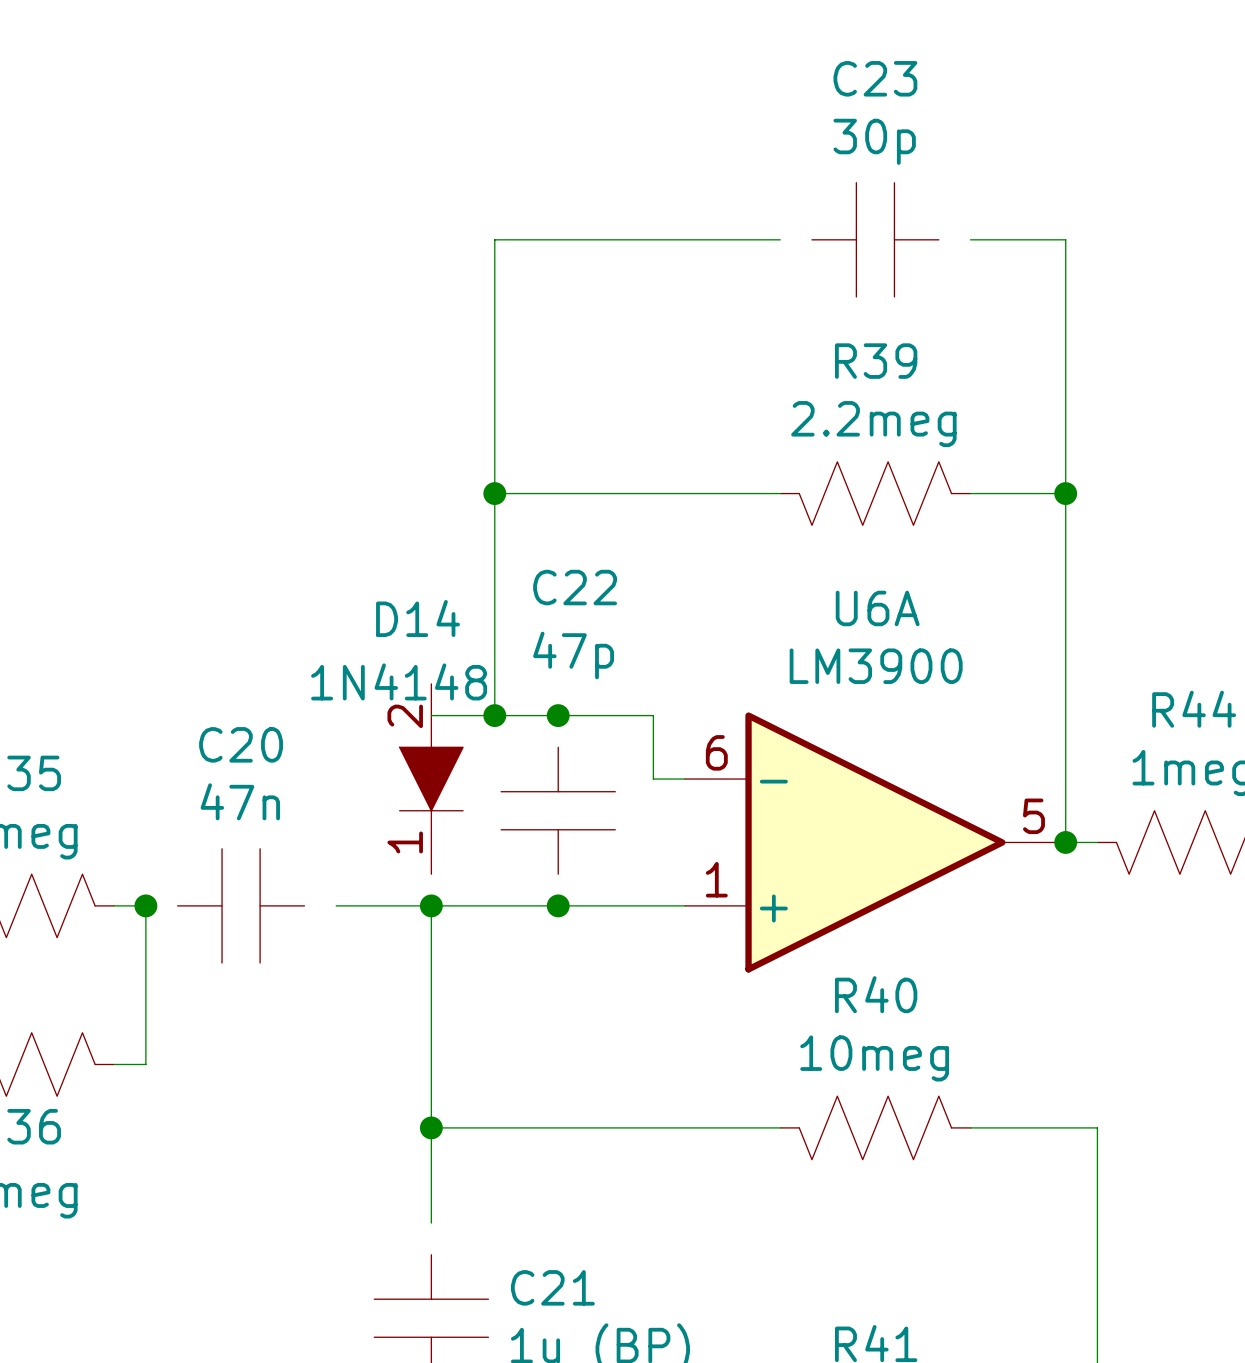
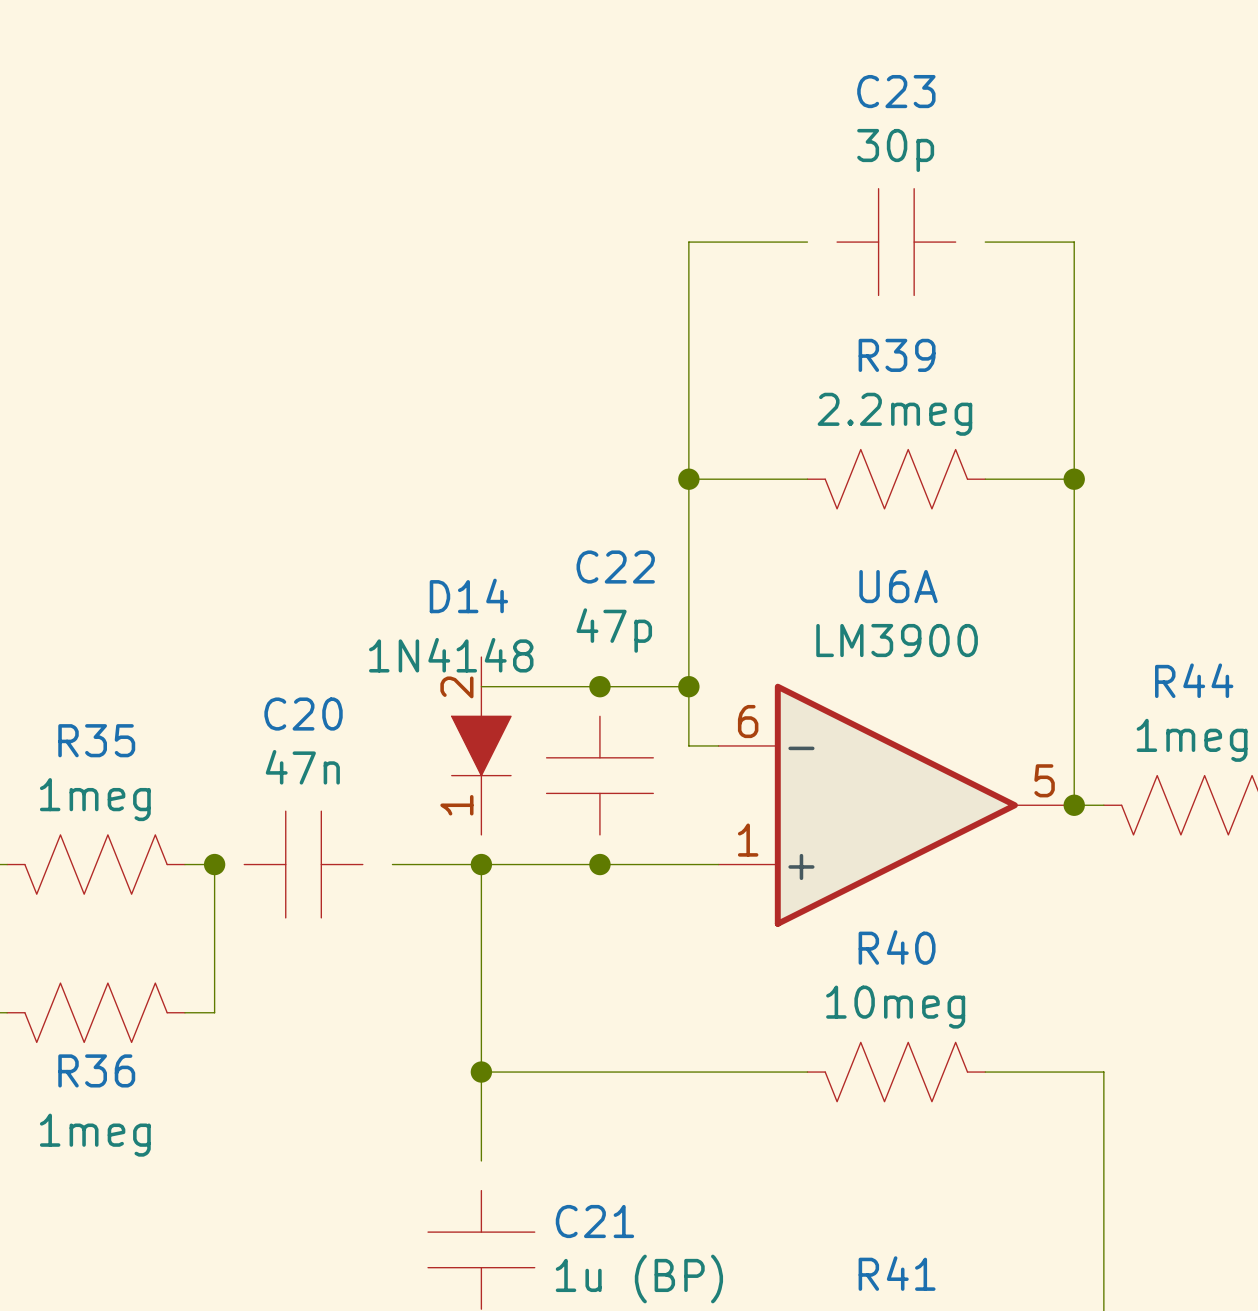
wire: (653, 239) (494, 239) (494, 715) -> (688, 242) (688, 686)
wire: (494, 493) (653, 493) -> none
junction: (494, 493) -> none
junction: none -> (688, 479)
junction: (494, 715) -> none
junction: none -> (688, 686)

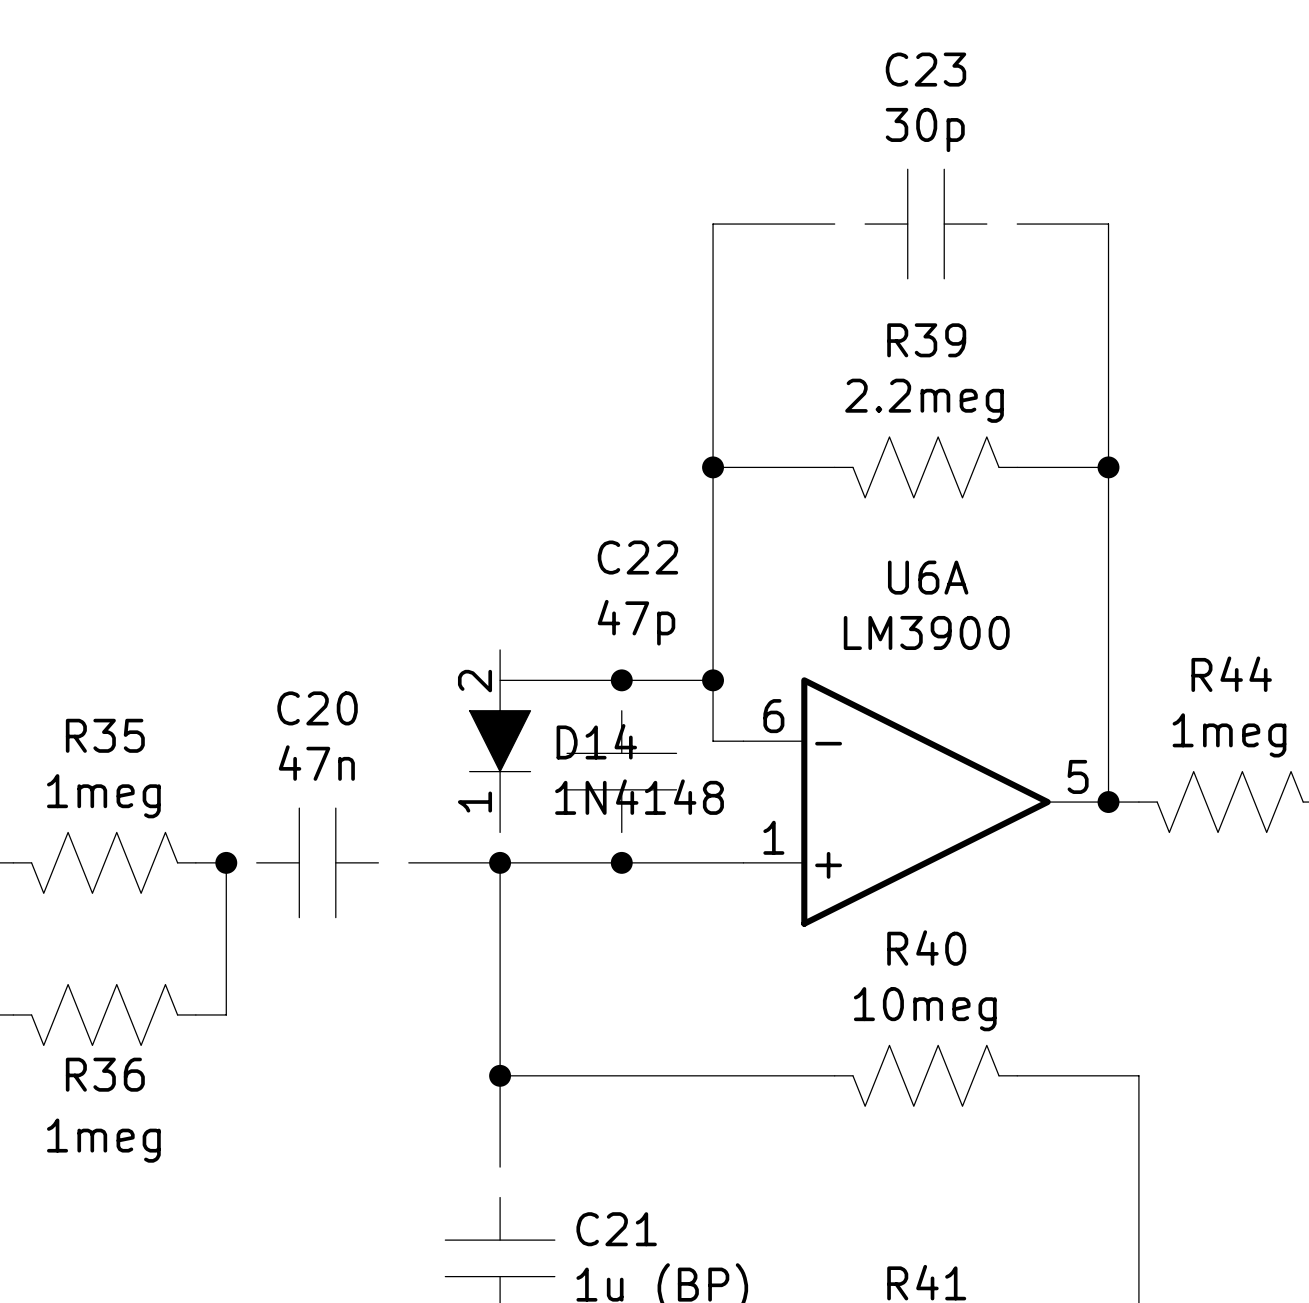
D14 name position: D14 (468, 595) -> D14 (596, 741)
D14 value position: 1N4148 (451, 655) -> 1N4148 (639, 797)

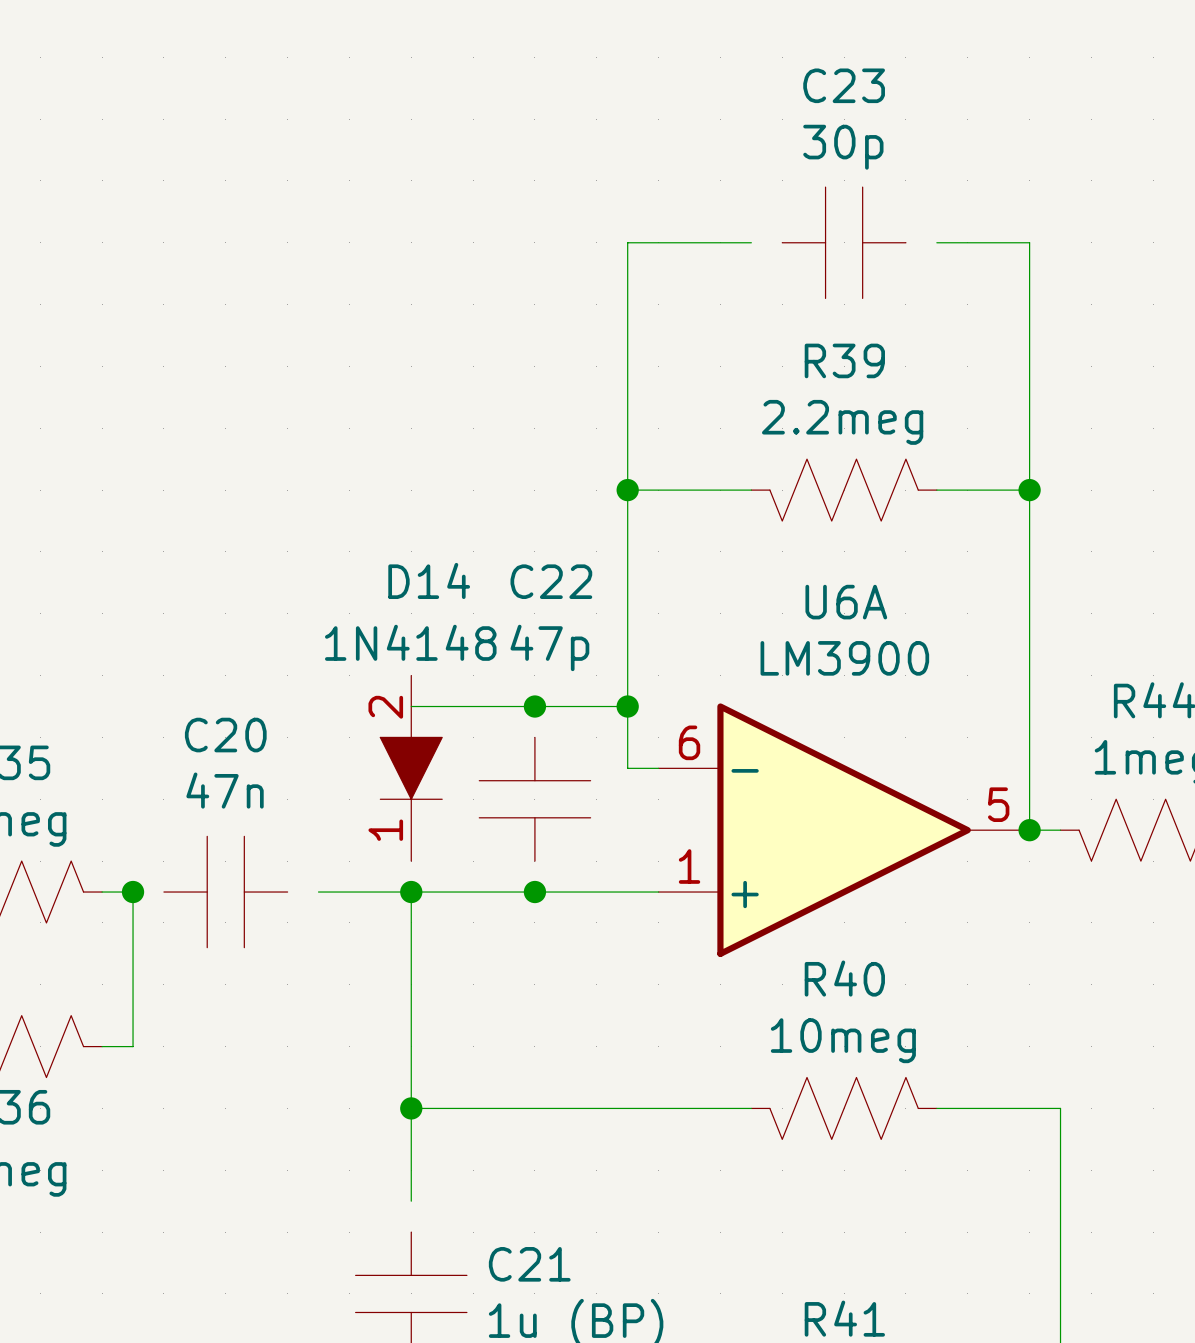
D14 name position: D14 (596, 741) -> D14 (429, 580)
D14 value position: 1N4148 (639, 797) -> 1N4148 (410, 642)

